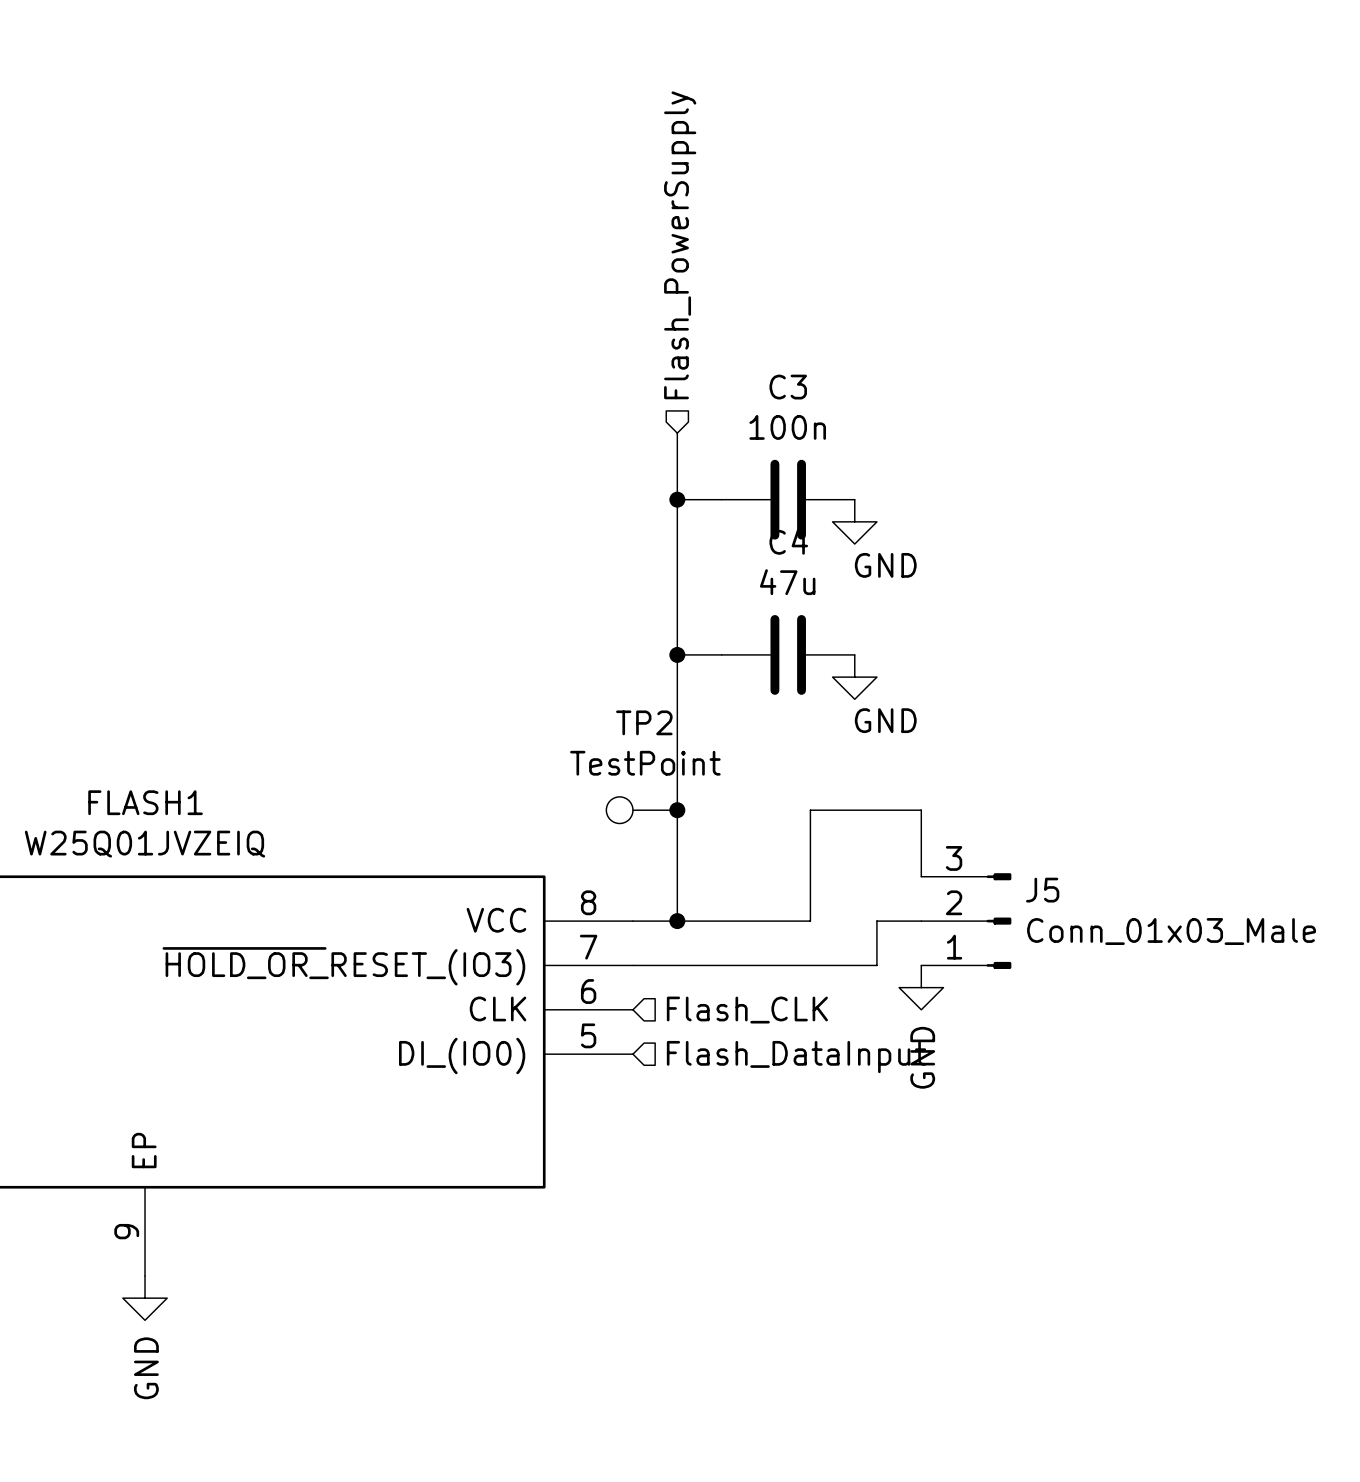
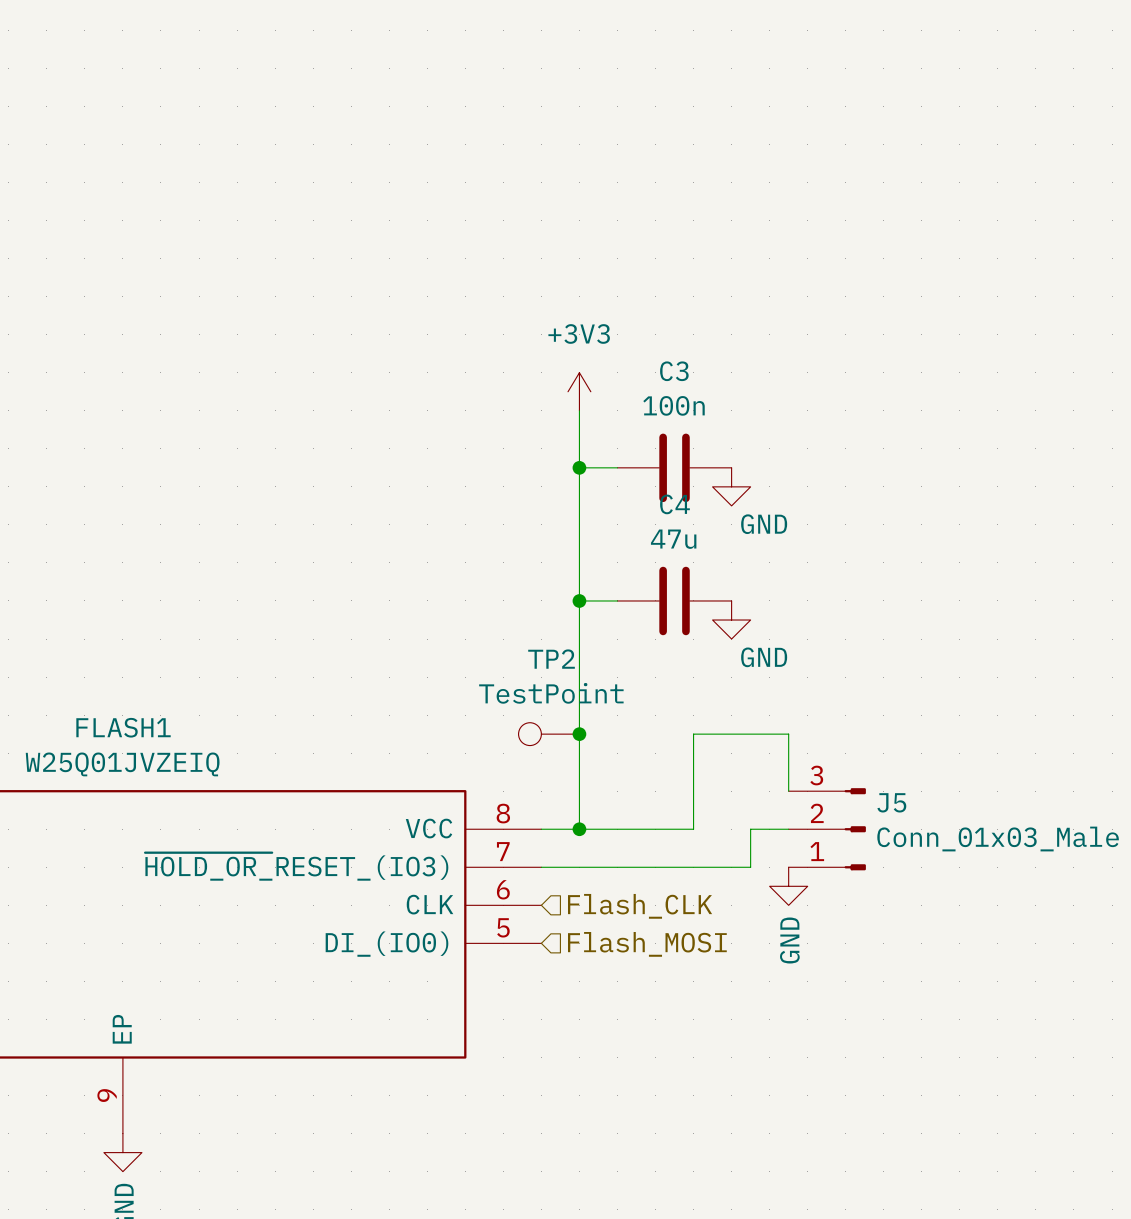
hierarchical label: Flash_PowerSupply (680, 245) -> none
power symbol: none -> +3V3 (579, 391)
hierarchical label: Flash_DataInput (796, 1057) -> Flash_MOSI (647, 944)

